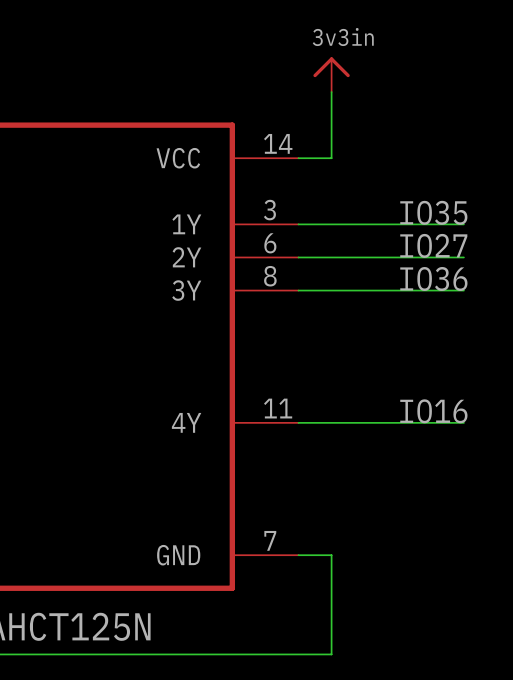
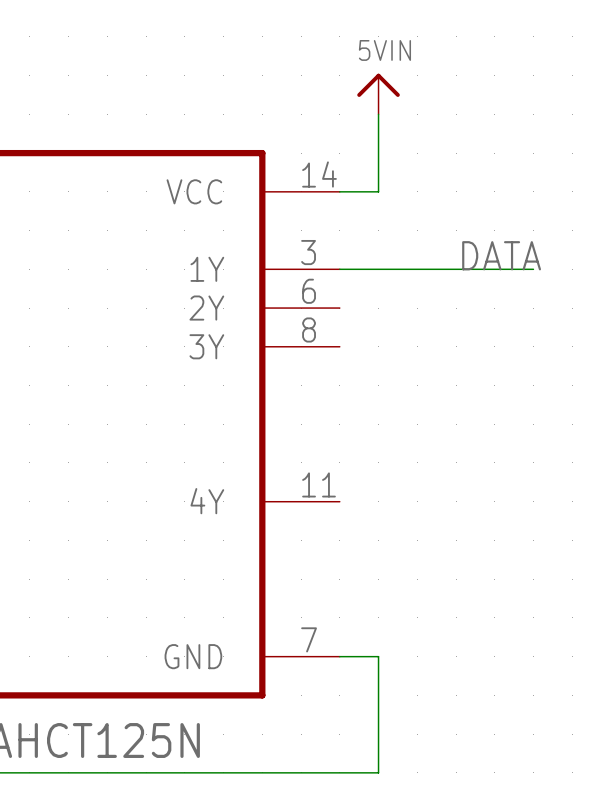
power symbol: 3v3in (331, 74) -> 5VIN (378, 94)
label: IO35 (433, 212) -> DATA (501, 255)
label: IO27 (433, 245) -> none
wire: (298, 257) (463, 257) -> none
label: IO36 (433, 278) -> none
wire: (298, 290) (463, 290) -> none
label: IO16 (433, 411) -> none
wire: (298, 422) (463, 422) -> none

